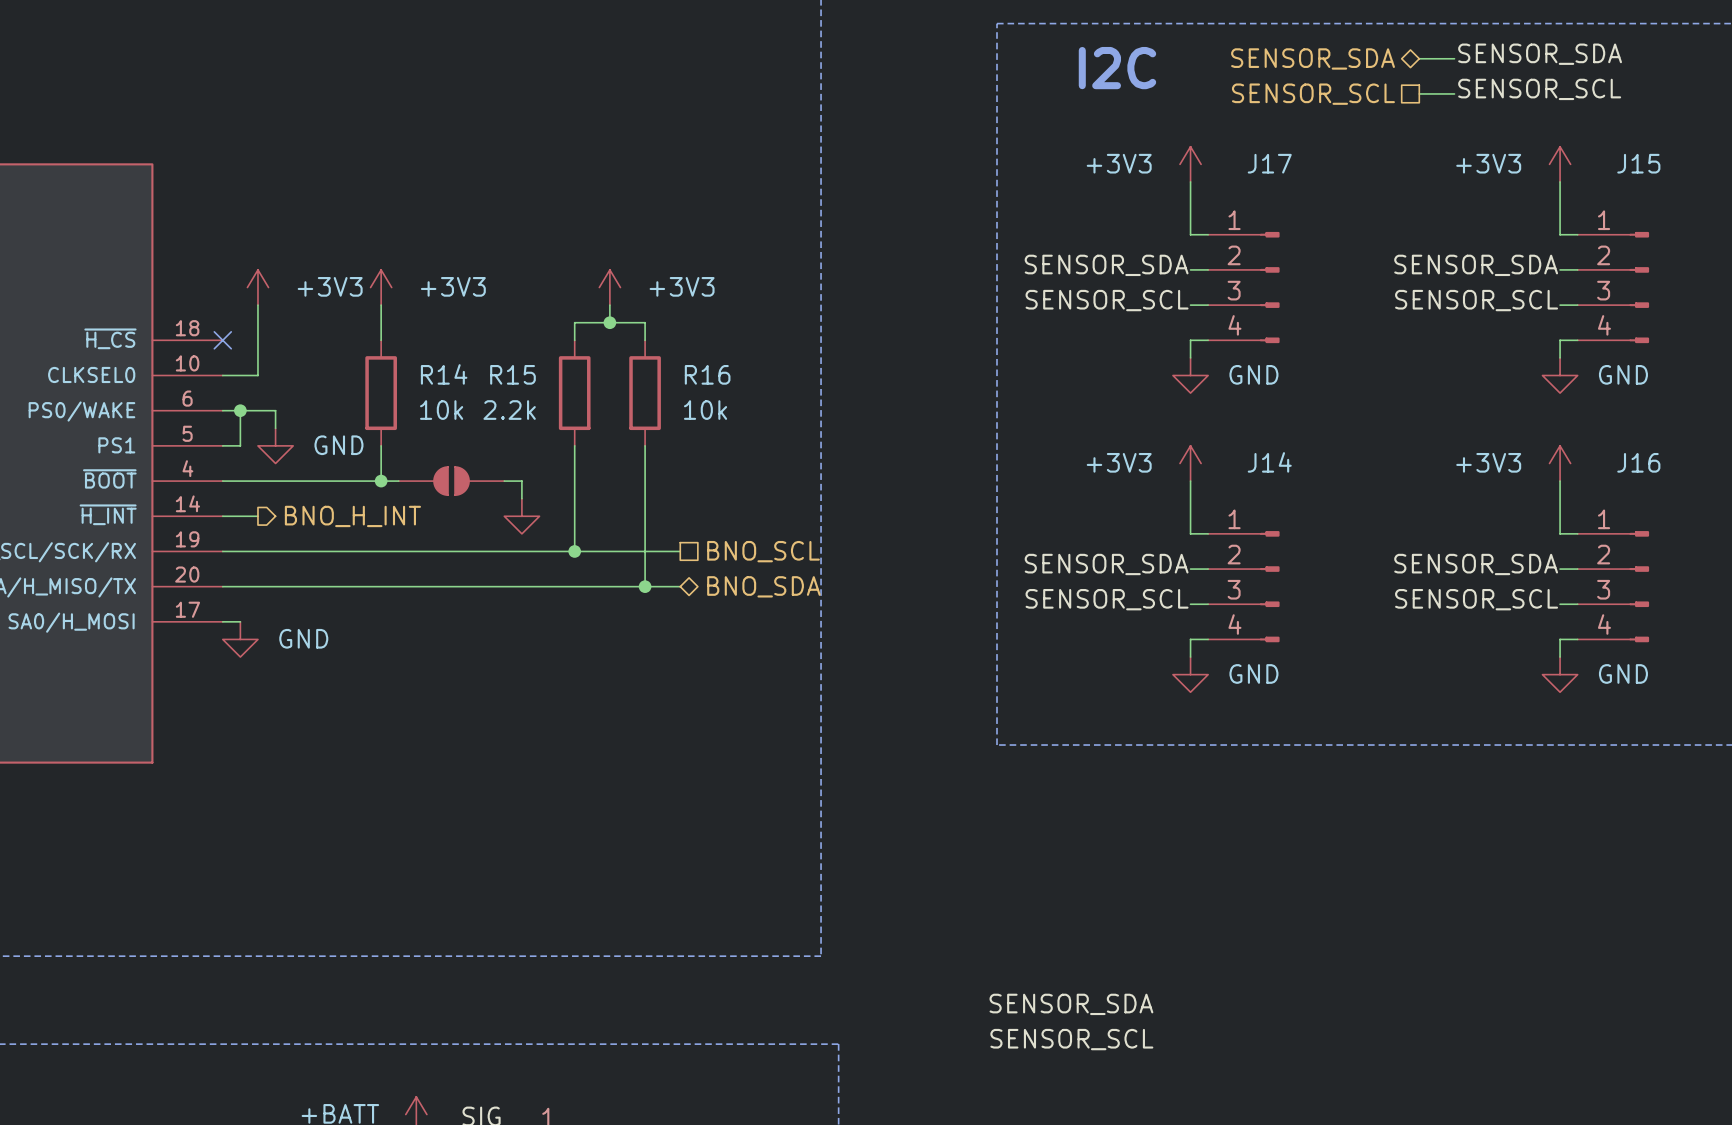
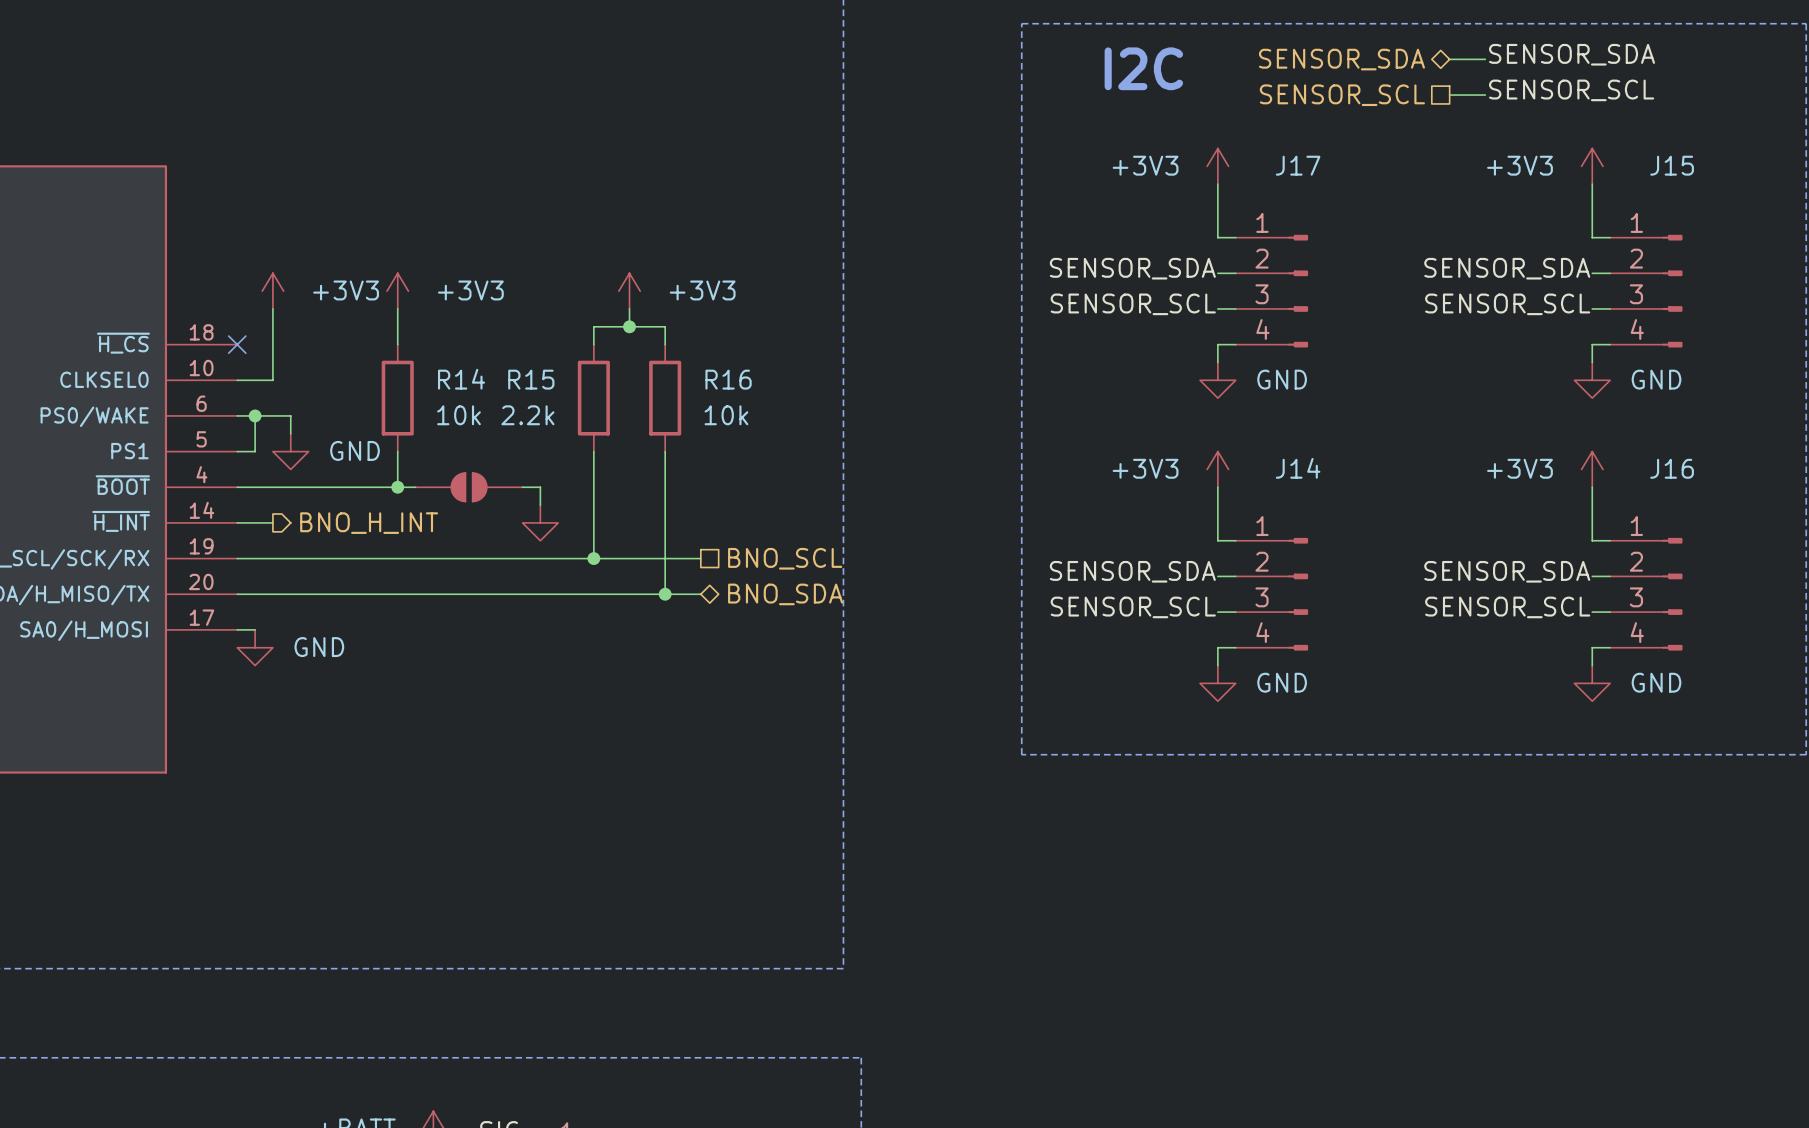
label: SENSOR_SDA (1071, 1004) -> none
label: SENSOR_SCL (1071, 1039) -> none

